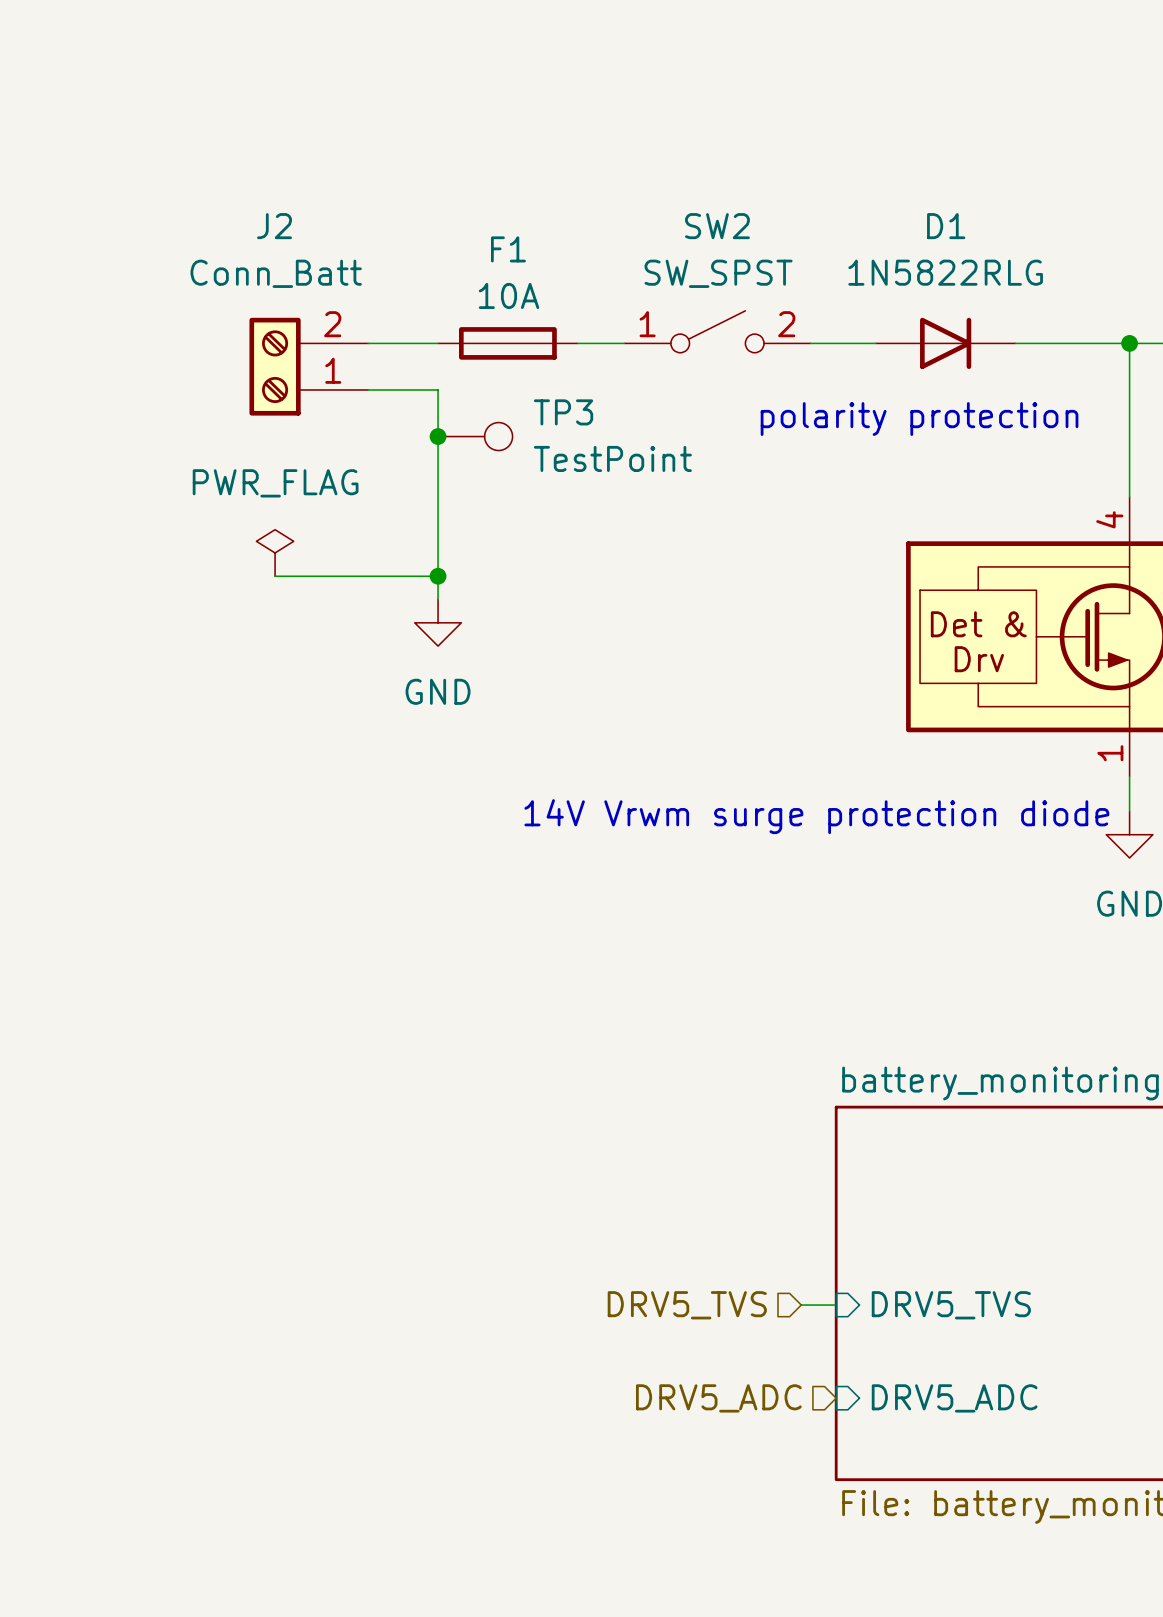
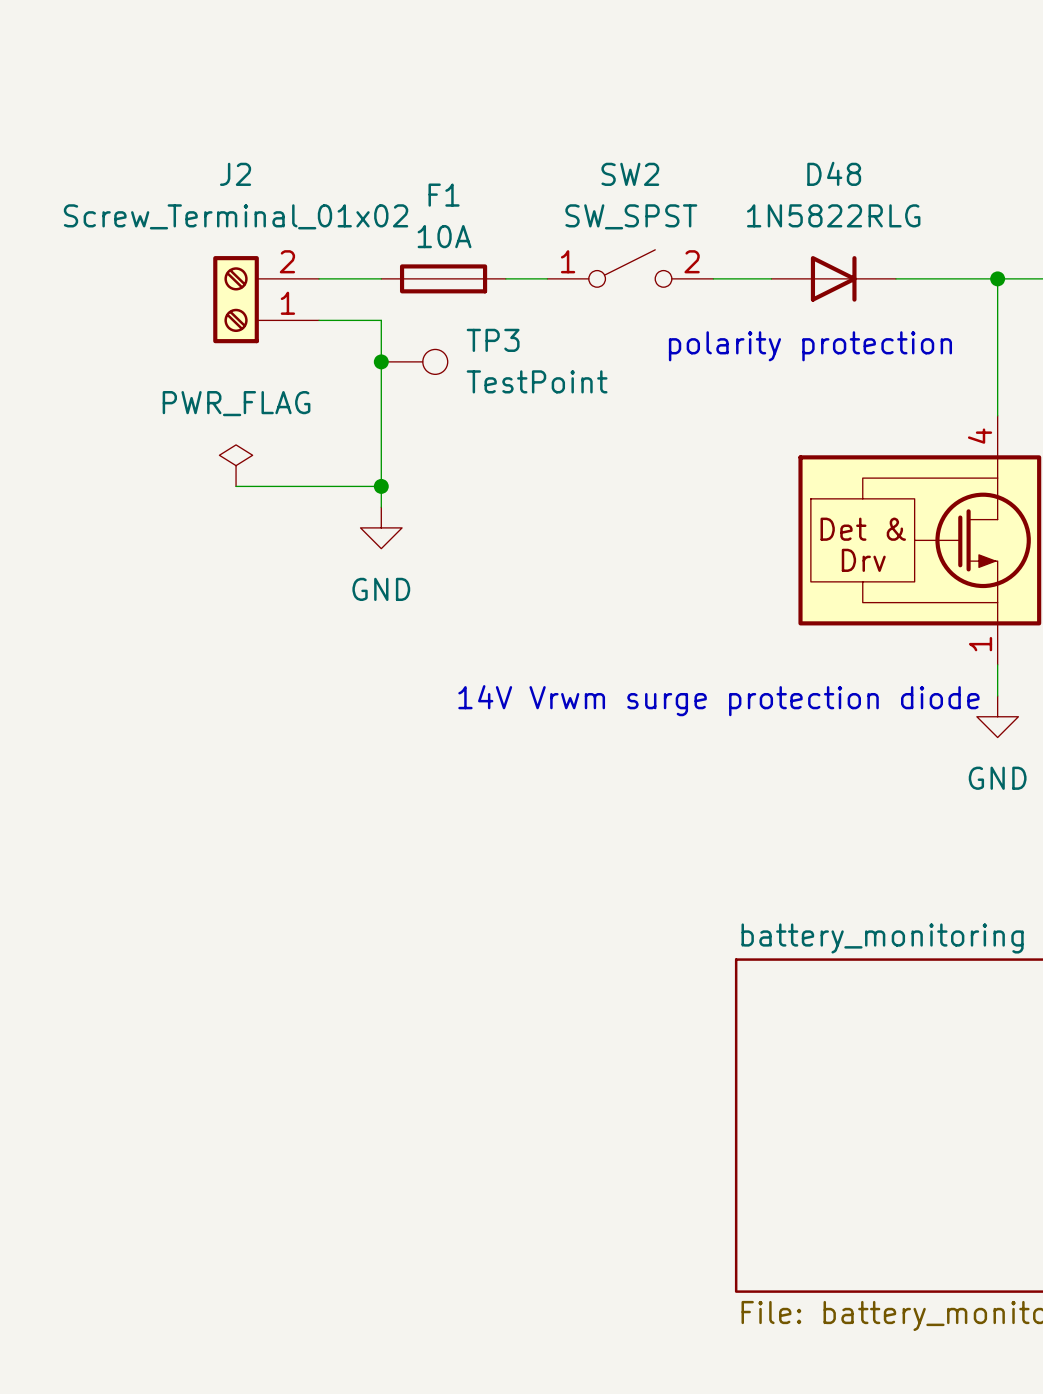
D1 name: D1 (946, 226) -> D48 (834, 173)
J2 value: Conn_Batt (276, 273) -> Screw_Terminal_01x02 (236, 216)
hierarchical label: DRV5_TVS (687, 1305) -> none
wire: (801, 1305) (836, 1305) -> none
sheet pin: DRV5_TVS (951, 1305) -> none
hierarchical label: DRV5_ADC (718, 1398) -> none
sheet pin: DRV5_ADC (954, 1398) -> none

